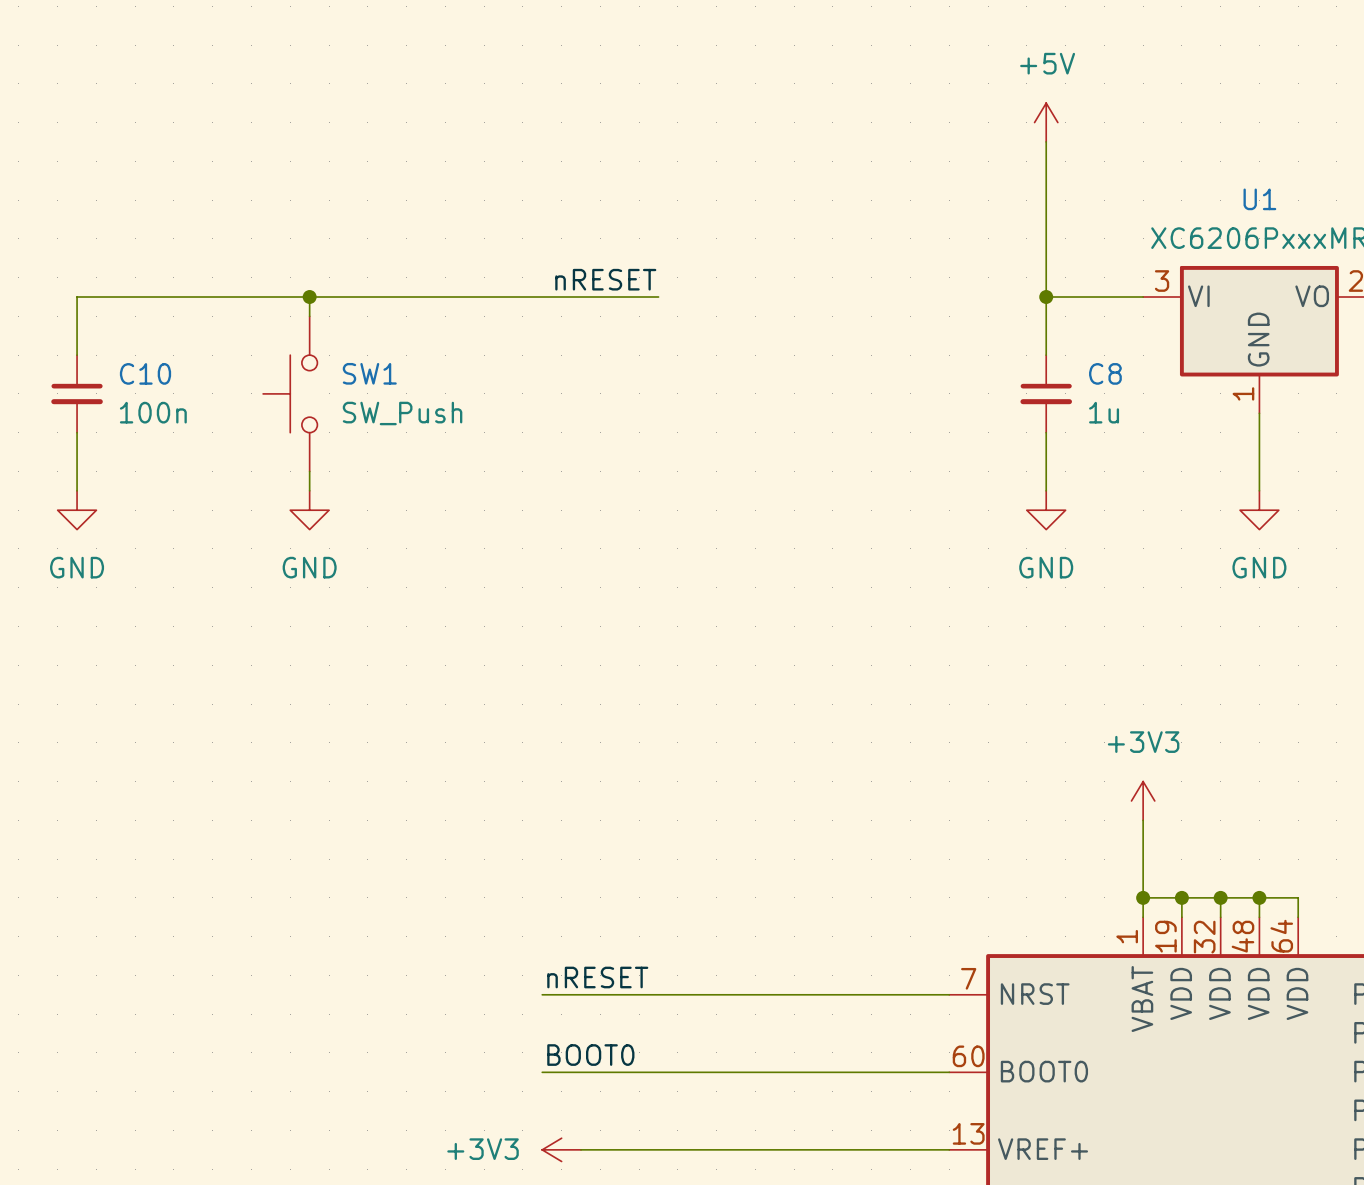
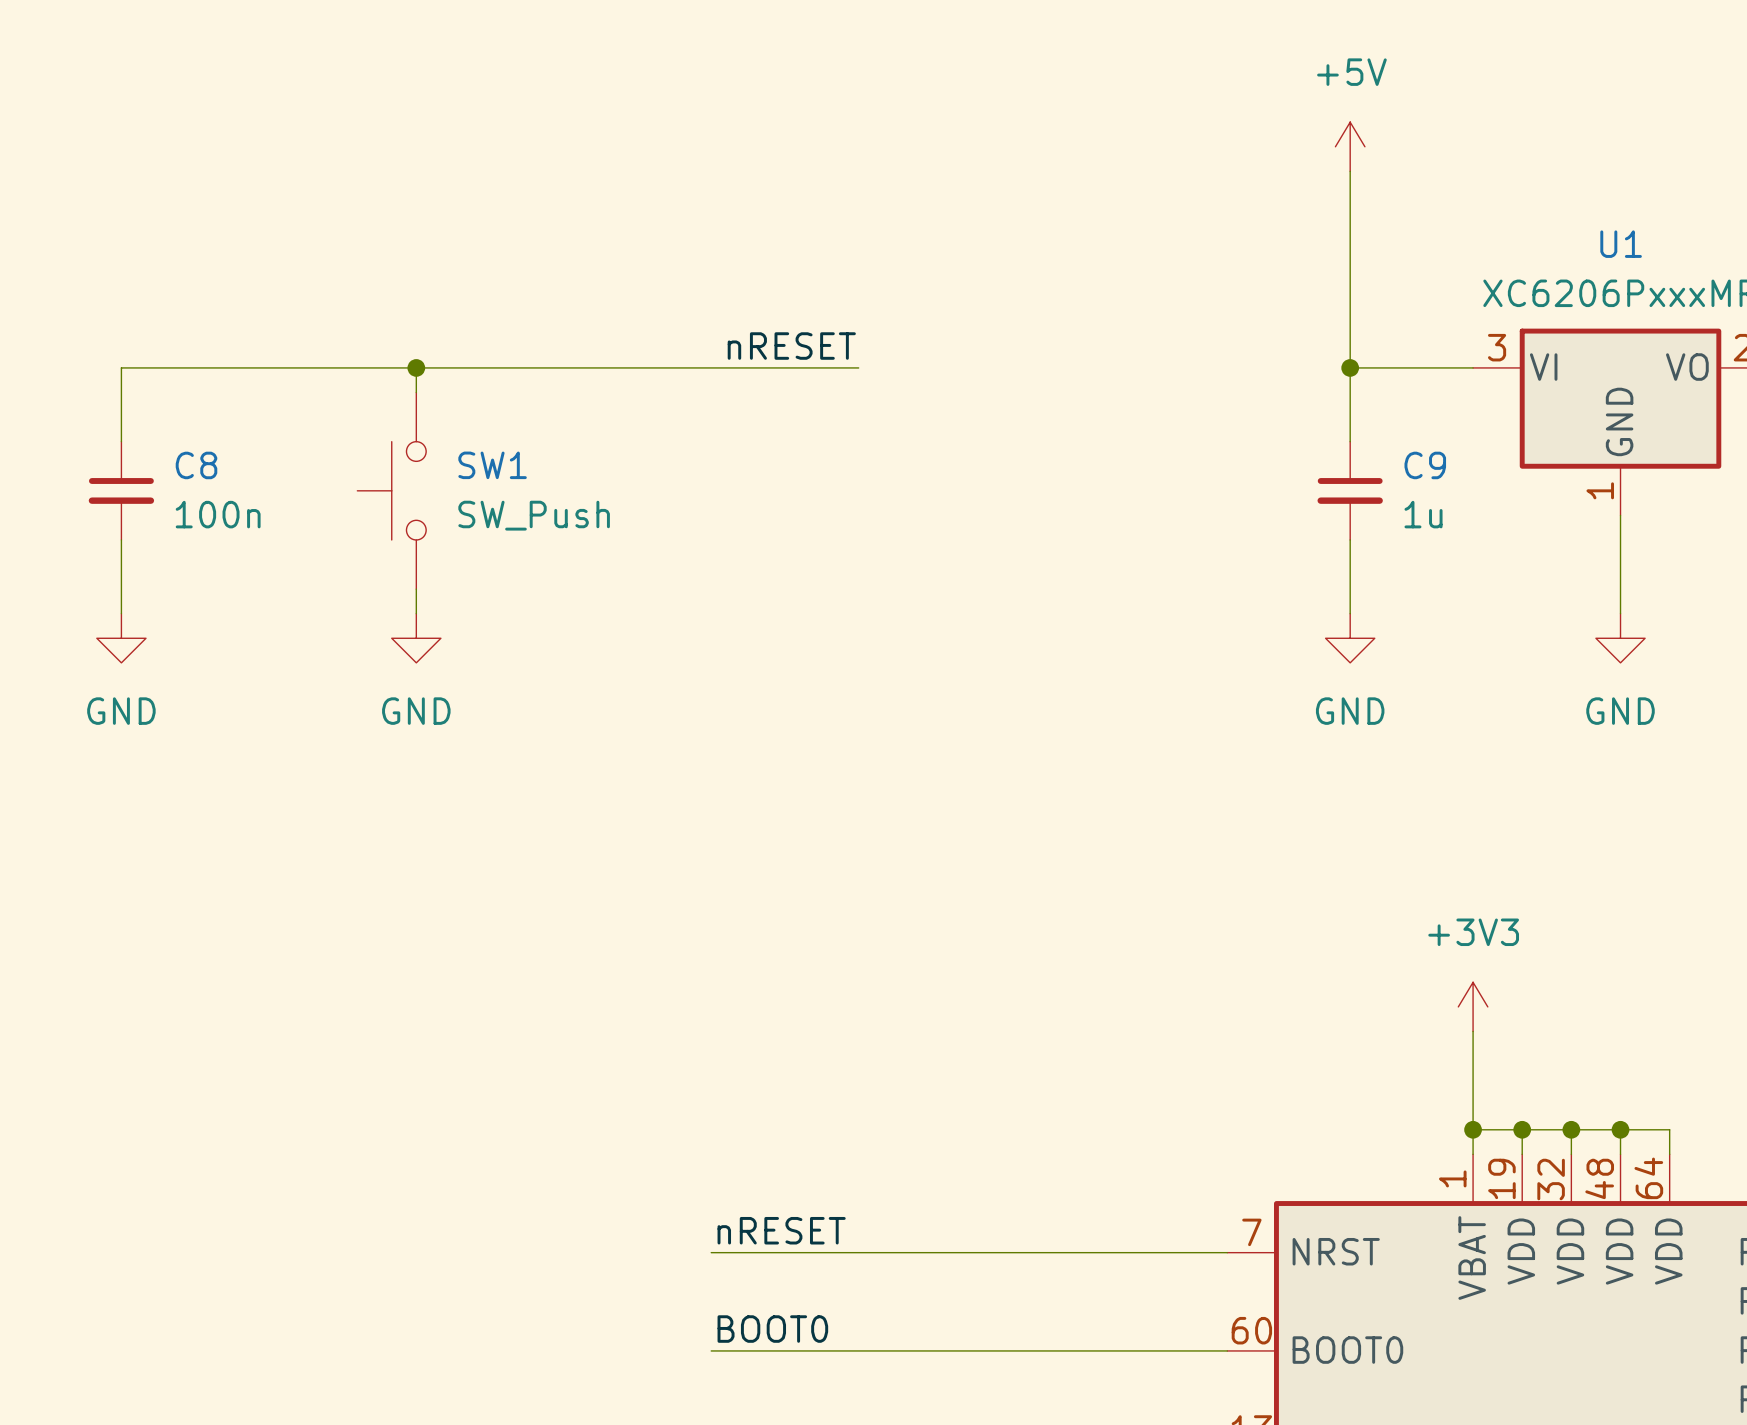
C10 name: C10 (145, 373) -> C8 (196, 465)
C8 name: C8 (1105, 373) -> C9 (1425, 465)

